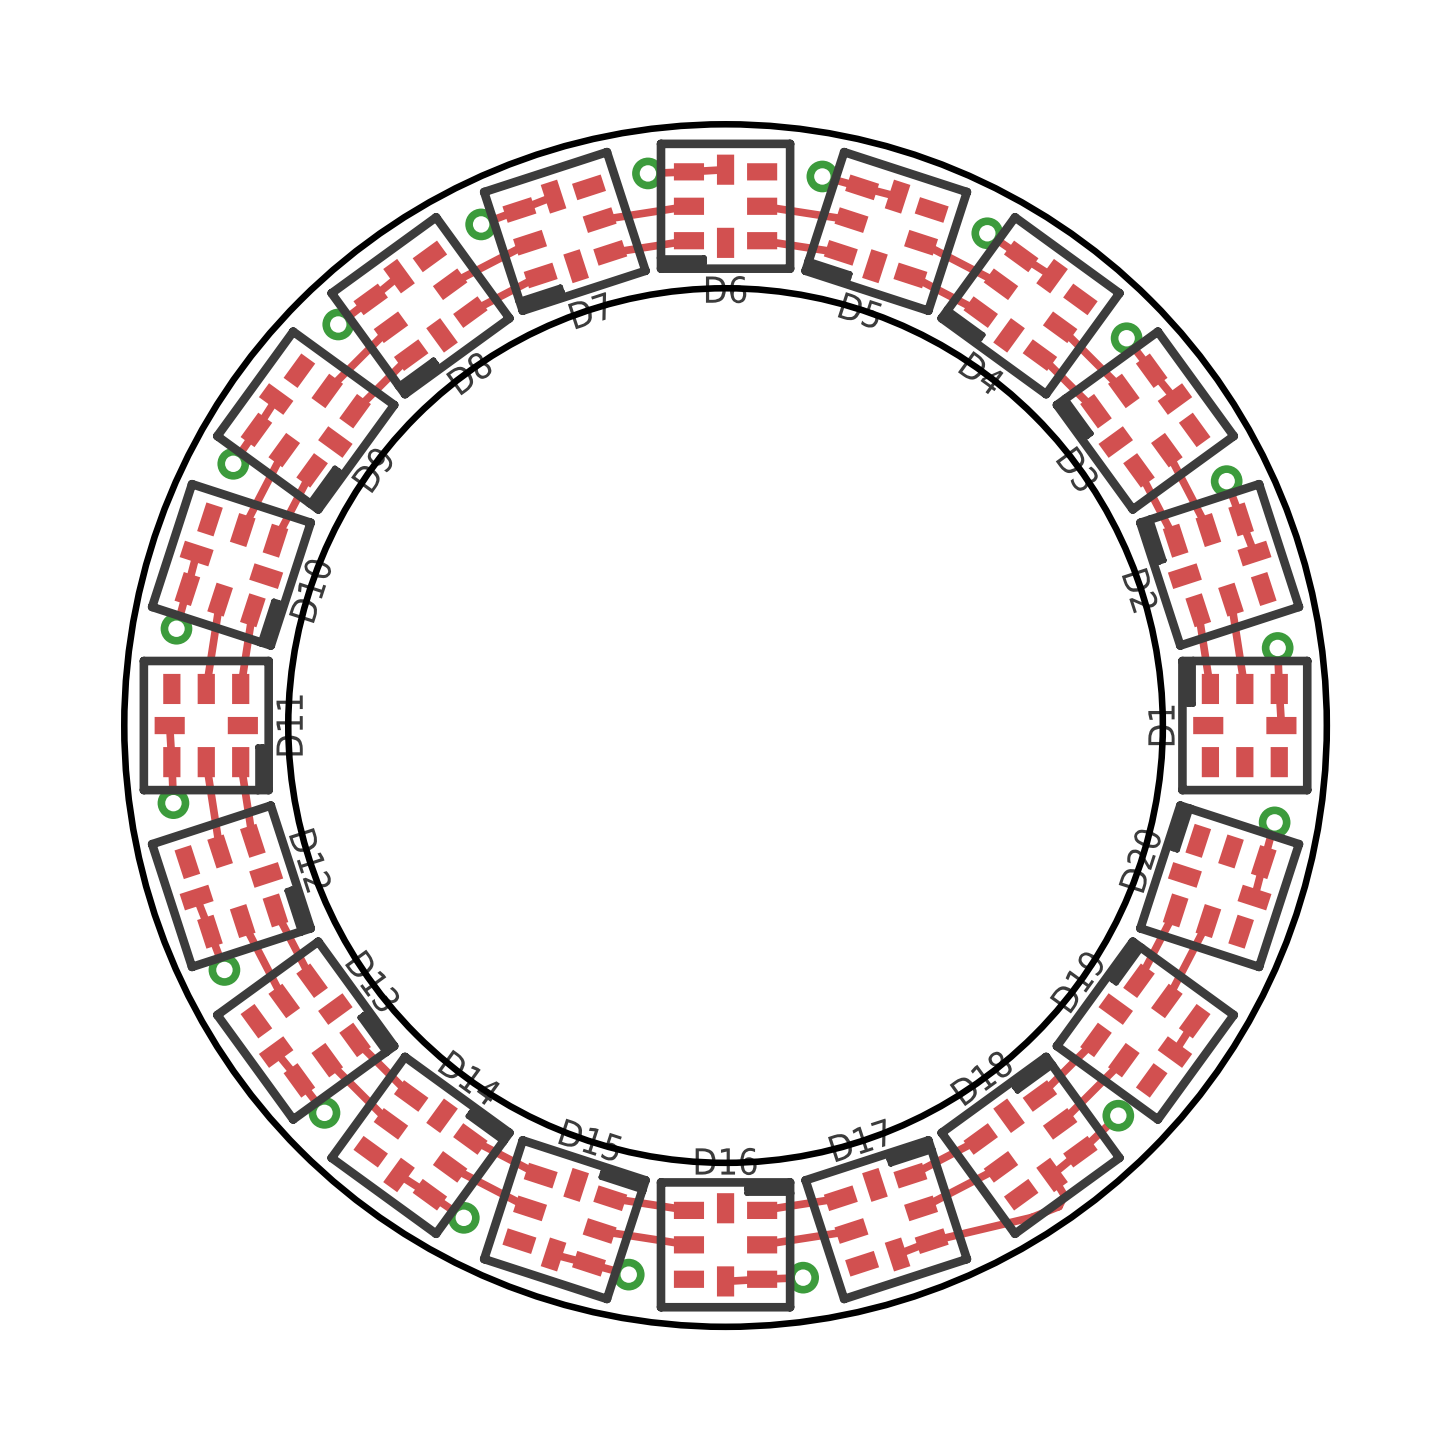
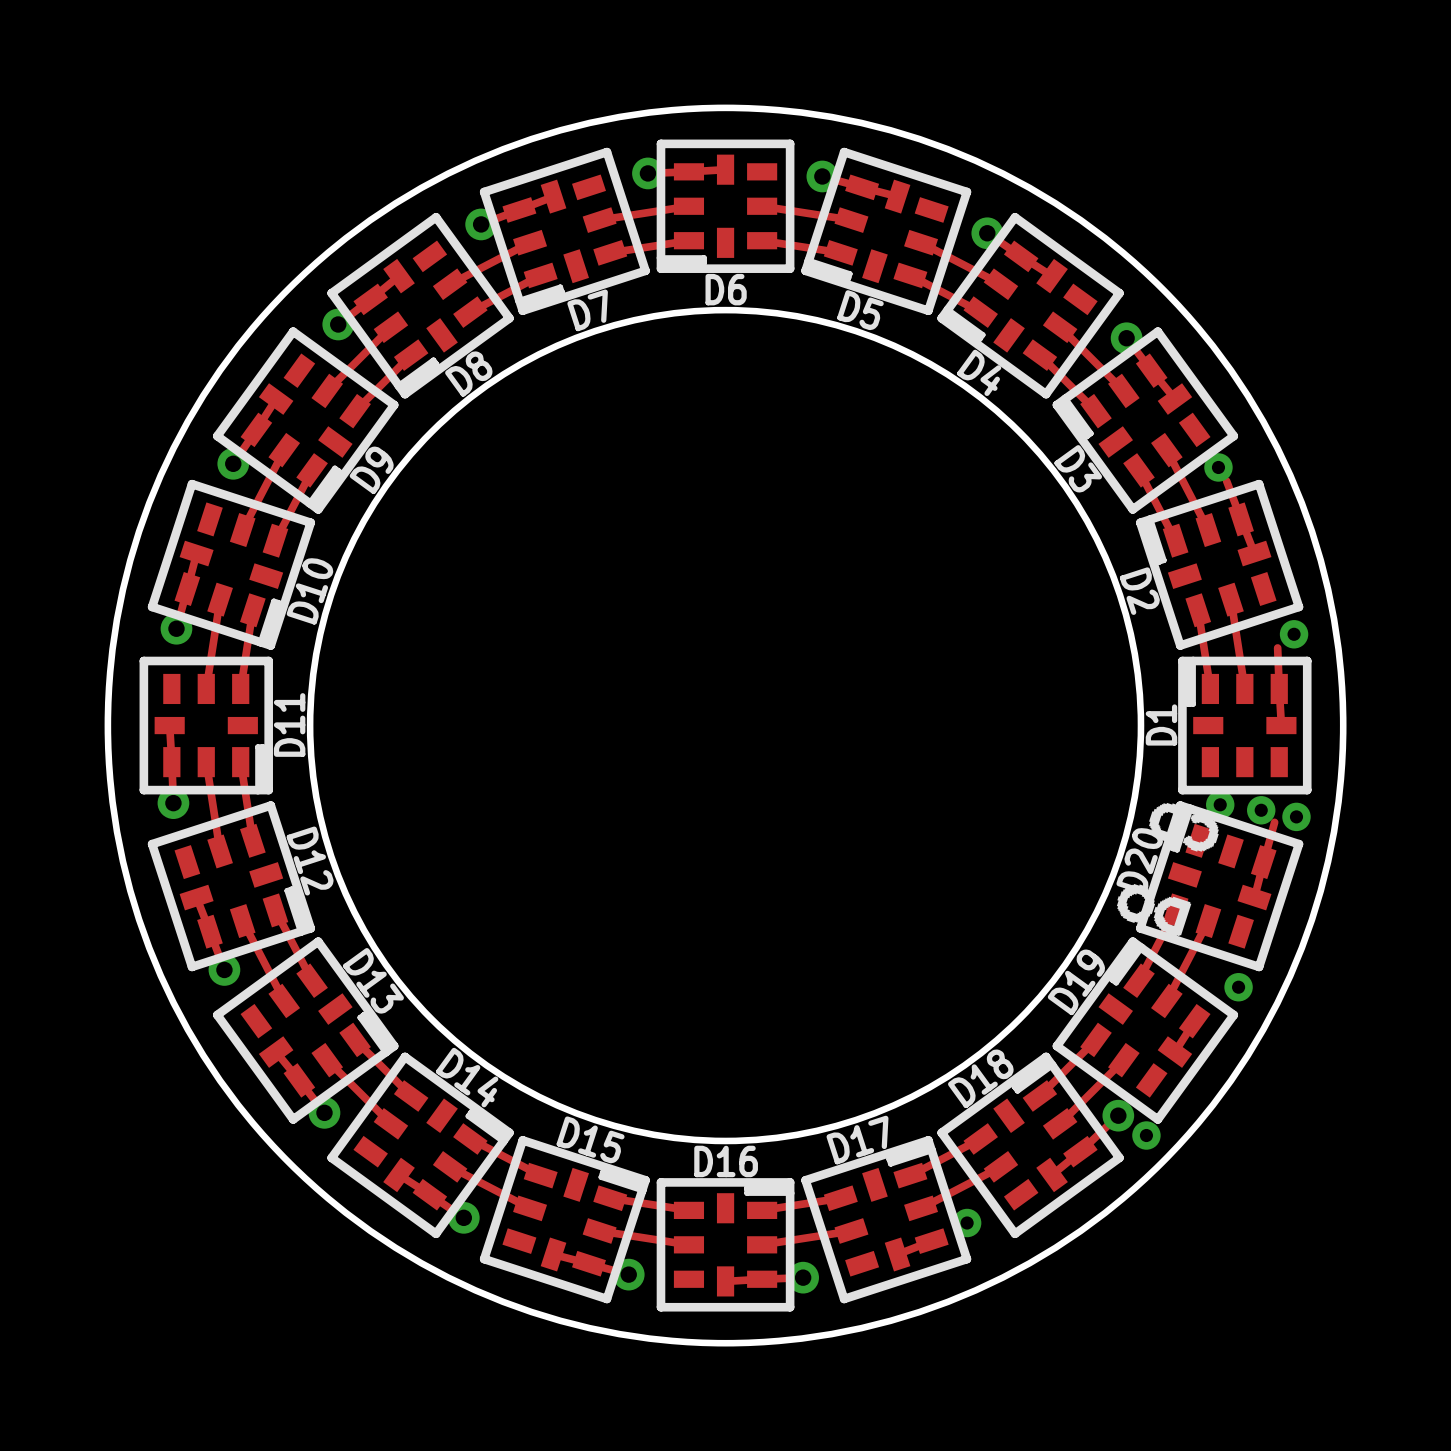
round board edge: none -> [104, 104, 1347, 1347]
round board edge: [121, 121, 1331, 1331] -> none
round board edge: [284, 284, 1167, 1167] -> none
round board edge: none -> [306, 306, 1145, 1145]
via position: (1226, 481) -> (1218, 467)
via position: (1277, 647) -> (1294, 634)
drawing: none -> [1116, 802, 1219, 937]
via: none -> (1220, 804)
via: none -> (1261, 810)
via: none -> (1296, 816)
via: (1274, 822) -> none
via: none -> (1238, 987)
via: none -> (1146, 1135)
track: (1052, 1174) (1064, 1195) (1058, 1206) (1031, 1217) (931, 1241) (933, 1238) -> none
via: none -> (967, 1223)

